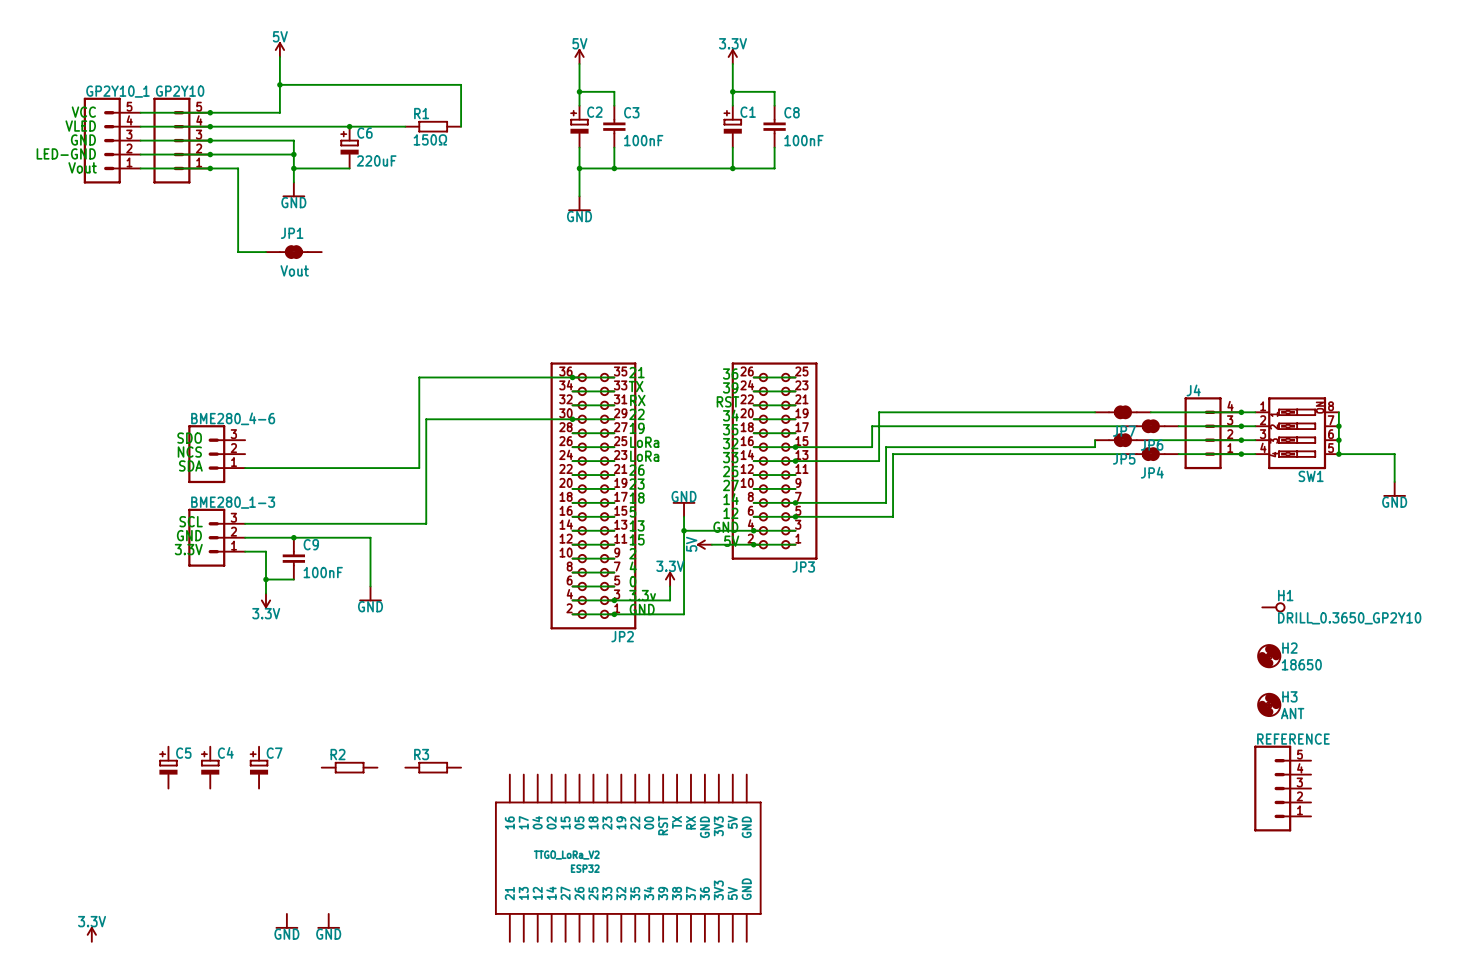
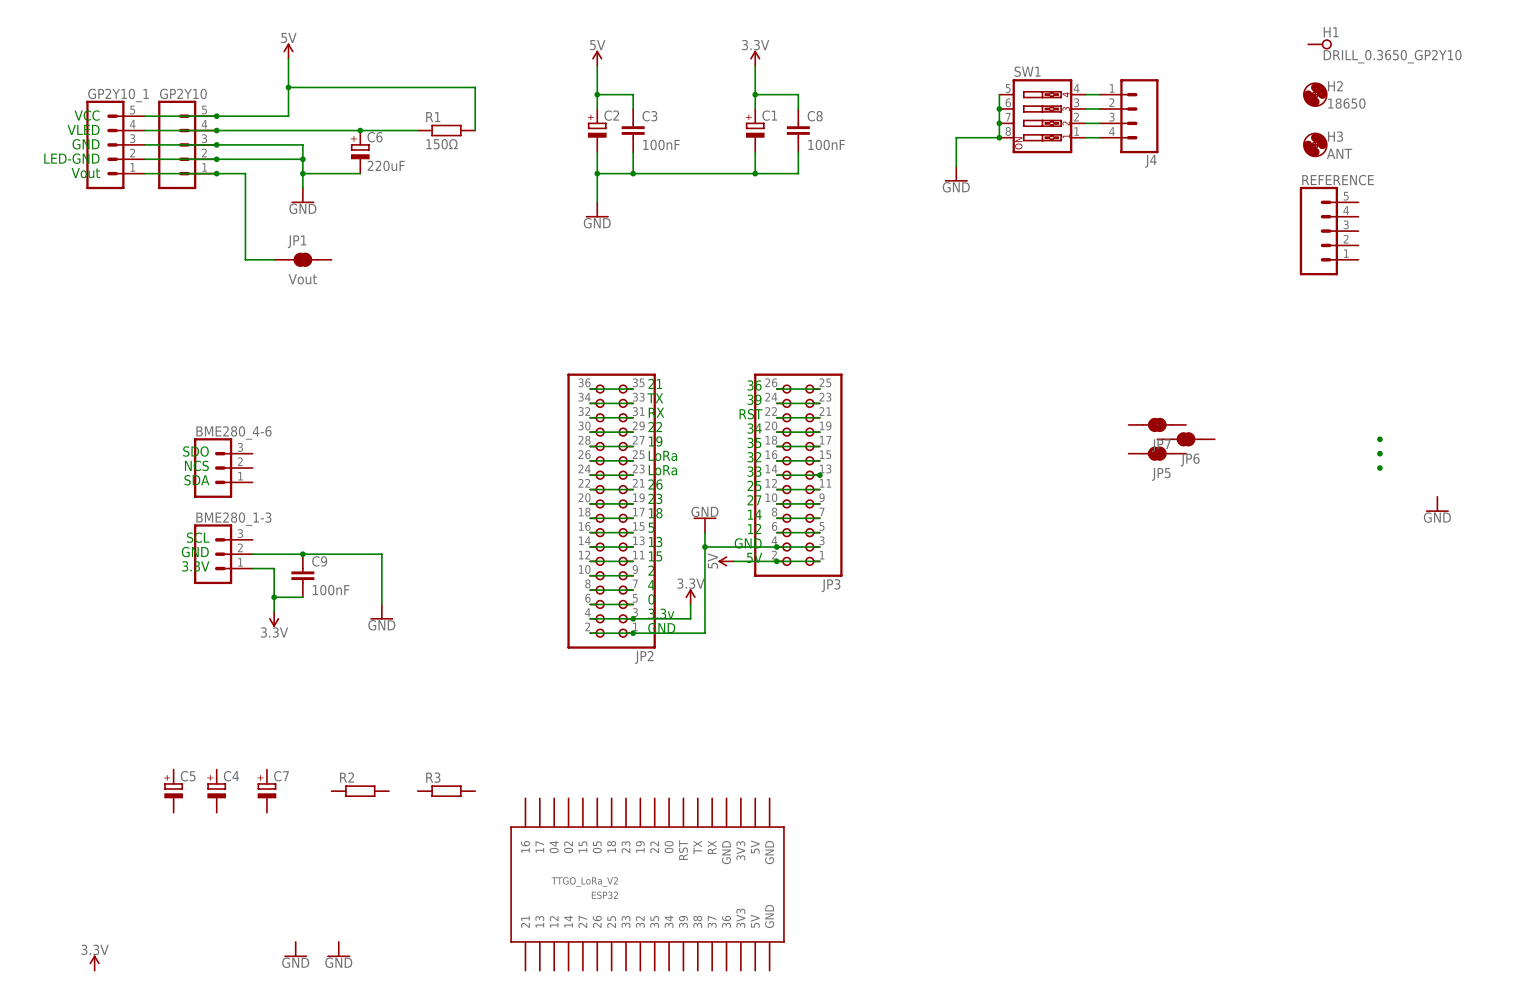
wire: none -> (999, 94) (999, 137) (956, 137) (956, 166)
wire: none -> (1085, 94) (1099, 94)
junction: none -> (999, 109)
wire: none -> (1085, 109) (1099, 109)
junction: none -> (999, 123)
wire: none -> (1085, 123) (1099, 123)
junction: none -> (999, 137)
wire: none -> (1085, 137) (1099, 137)
power symbol: none -> GND (956, 173)
REFERENCE: none -> (1329, 231)
wire: (572, 377) (419, 377) (419, 468) (245, 468) -> none
junction: (572, 377) -> none
SW1 symbol: [1255, 397, 1339, 470] -> [999, 79, 1086, 154]
wire: (1095, 412) (879, 412) (879, 461) (795, 461) -> none
wire: (1150, 412) (1255, 412) -> none
junction: (1241, 412) -> none
wire: (1338, 412) (1338, 454) (1394, 454) (1394, 481) -> none
wire: (572, 419) (426, 419) (426, 523) (245, 523) -> none
junction: (572, 419) -> none
wire: (1122, 426) (872, 426) (872, 447) (795, 447) -> none
wire: (1178, 426) (1255, 426) -> none
junction: (1241, 426) -> none
J4 rotation: 0° (1203, 433) -> 180° (1139, 116)
J4 position: (1212, 433) -> (1129, 116)
wire: (1095, 440) (1095, 447) (886, 447) (886, 502) (795, 502) -> none
wire: (1150, 440) (1255, 440) -> none
junction: (1241, 440) -> none
junction: (795, 447) -> none
wire: (1122, 454) (893, 454) (893, 516) (795, 516) -> none
JP4: (1150, 454) -> none
wire: (1178, 454) (1255, 454) -> none
junction: (1241, 454) -> none
SW1 name position: SW1 (1311, 476) -> SW1 (1027, 71)
junction: (795, 502) -> none
junction: (795, 516) -> none
H1 position: (1273, 607) -> (1319, 44)
H2 position: (1269, 656) -> (1315, 94)
H3 position: (1269, 704) -> (1315, 144)
REFERENCE: (1282, 788) -> none

